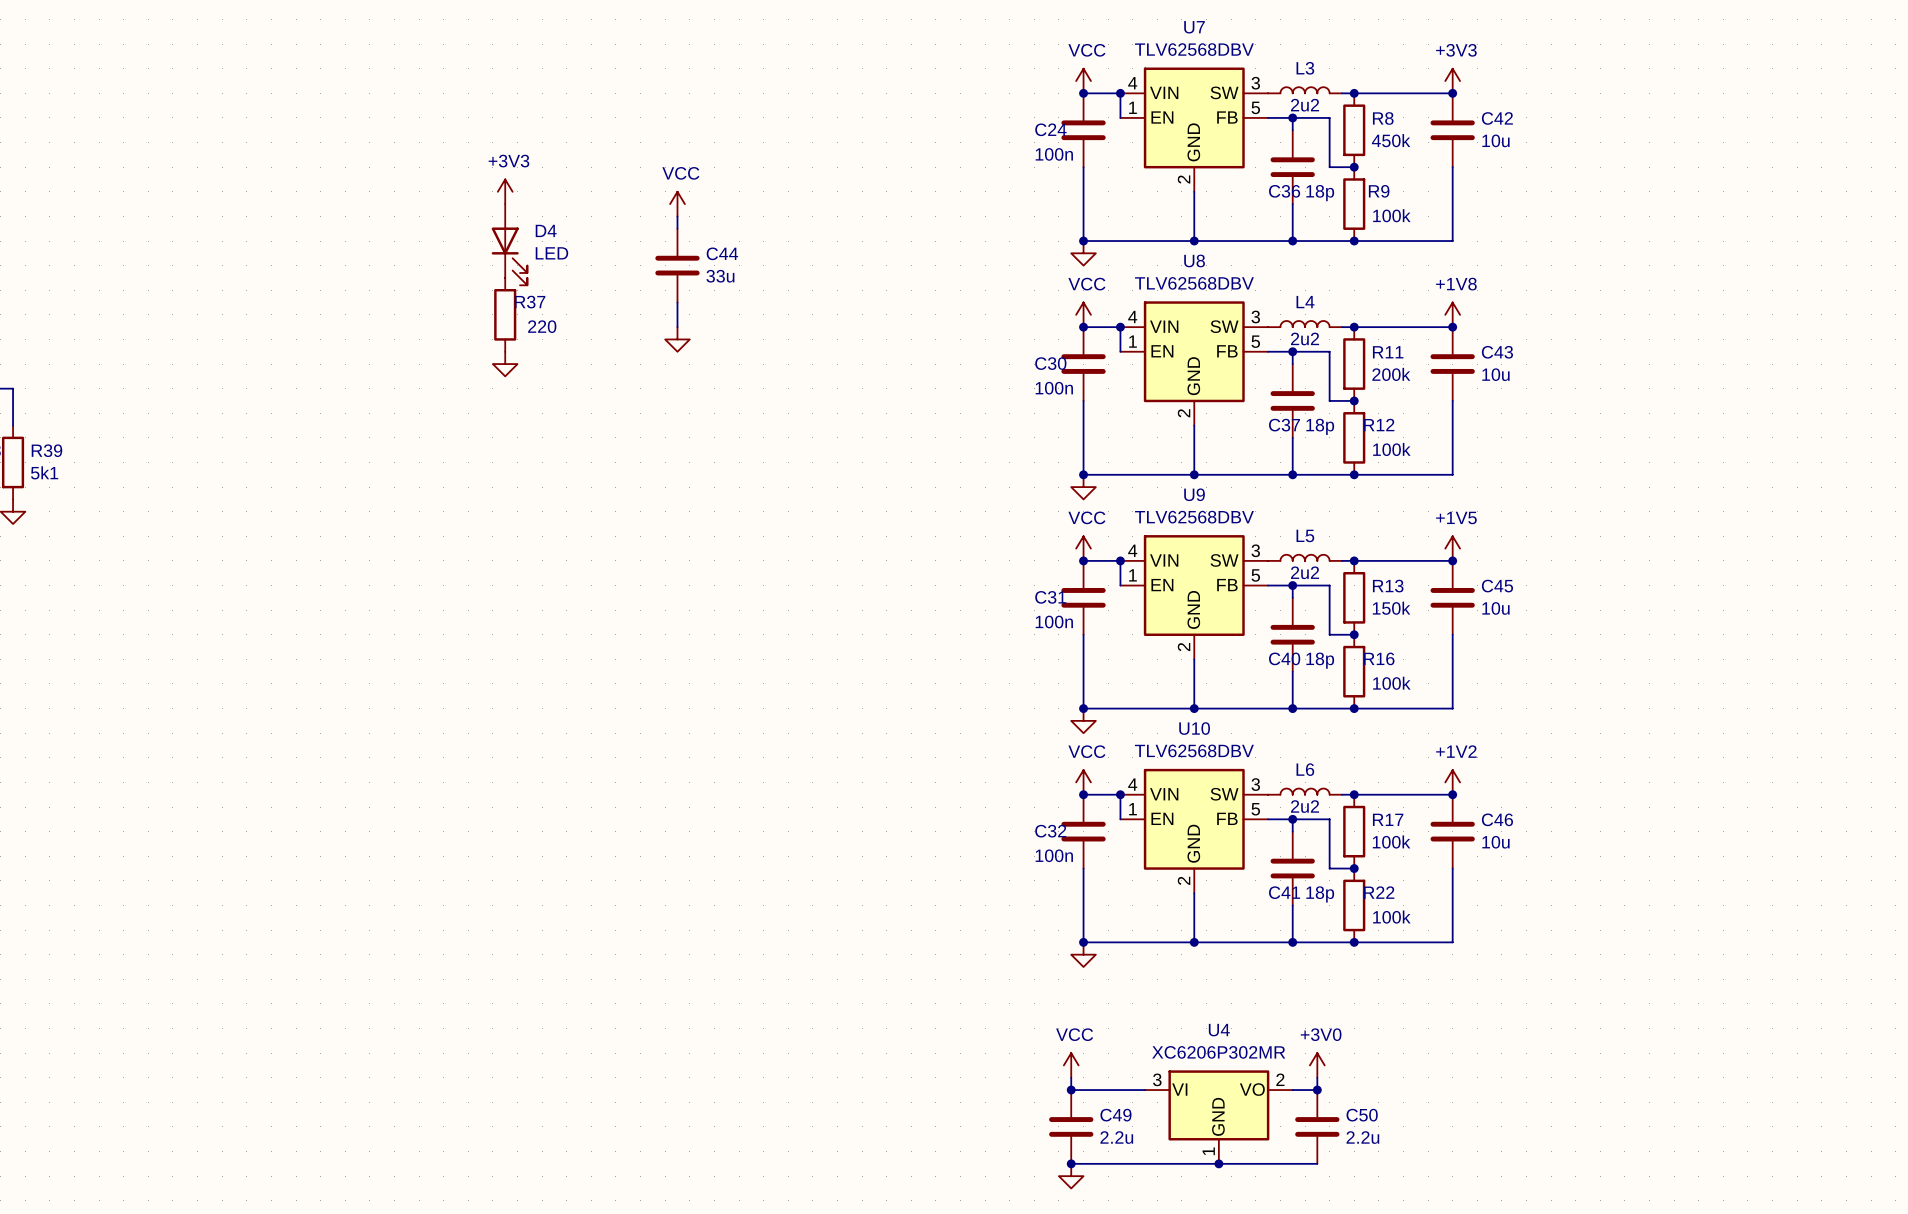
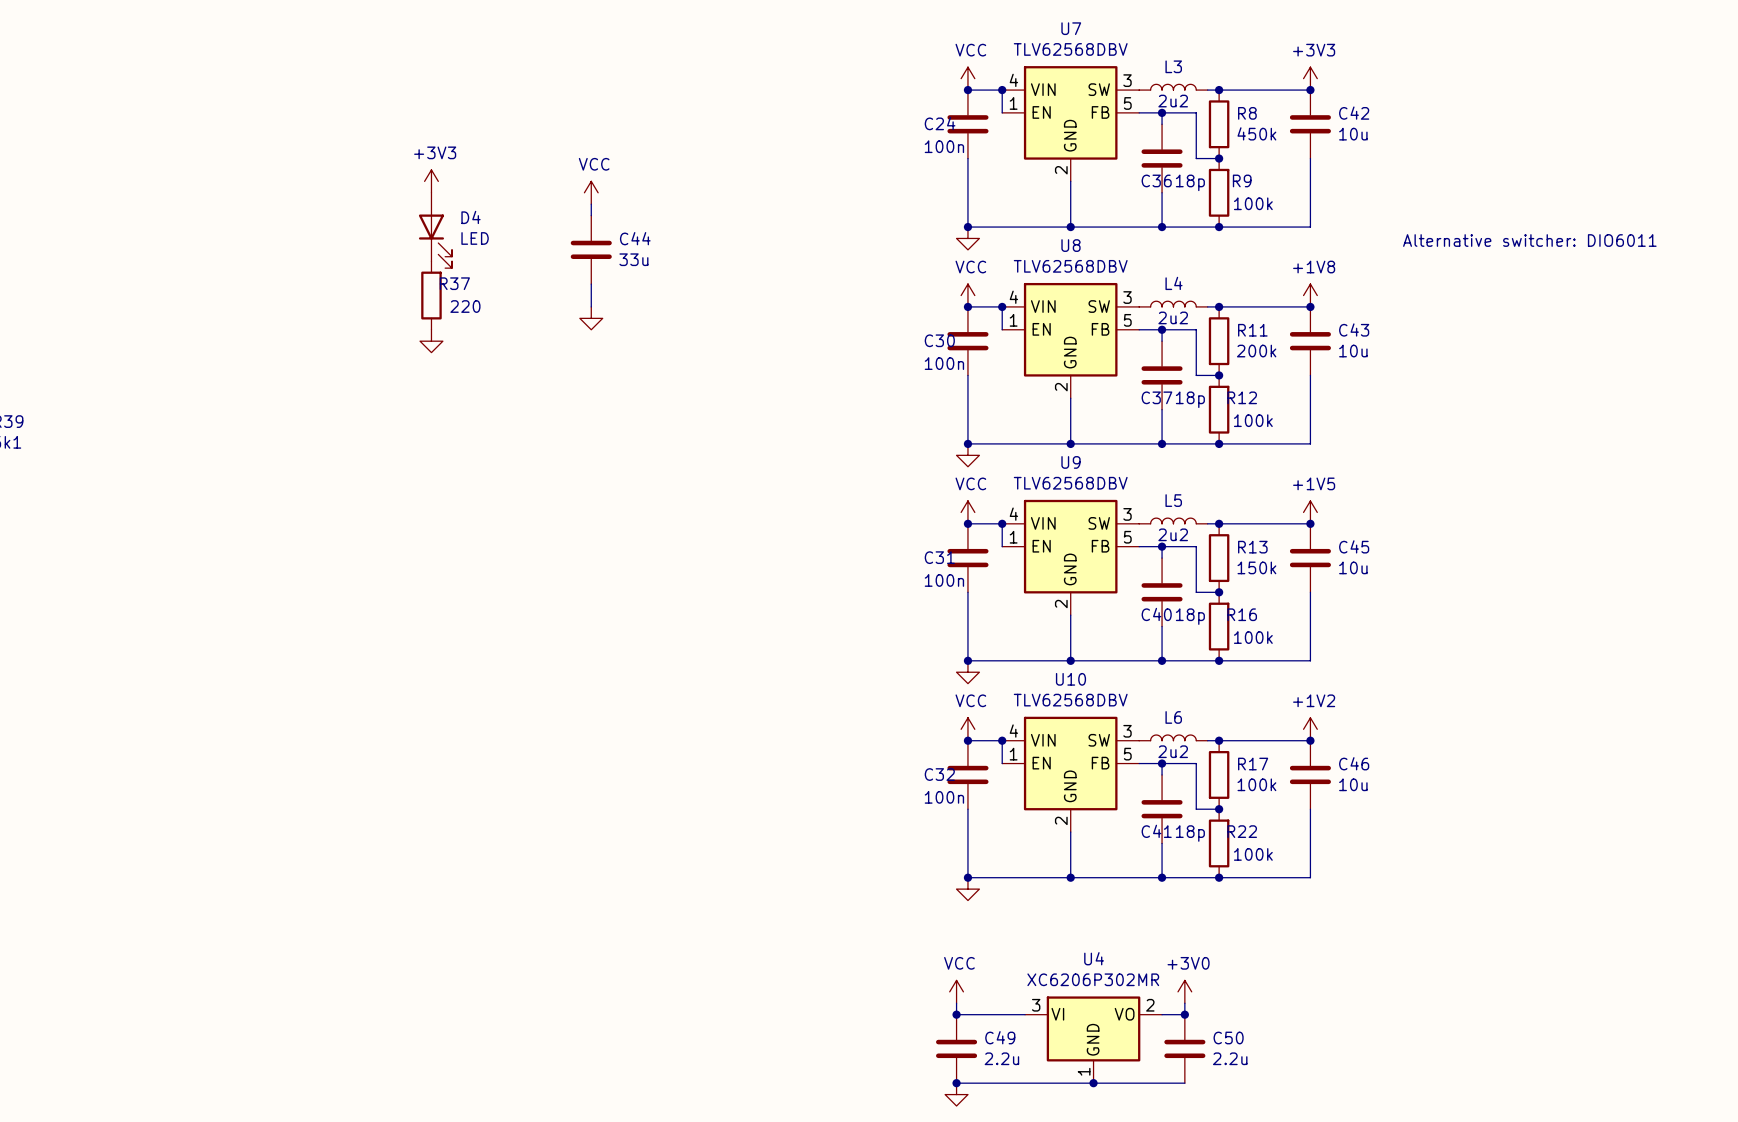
text: none -> Alternative switcher: DIO6011 (1529, 240)

